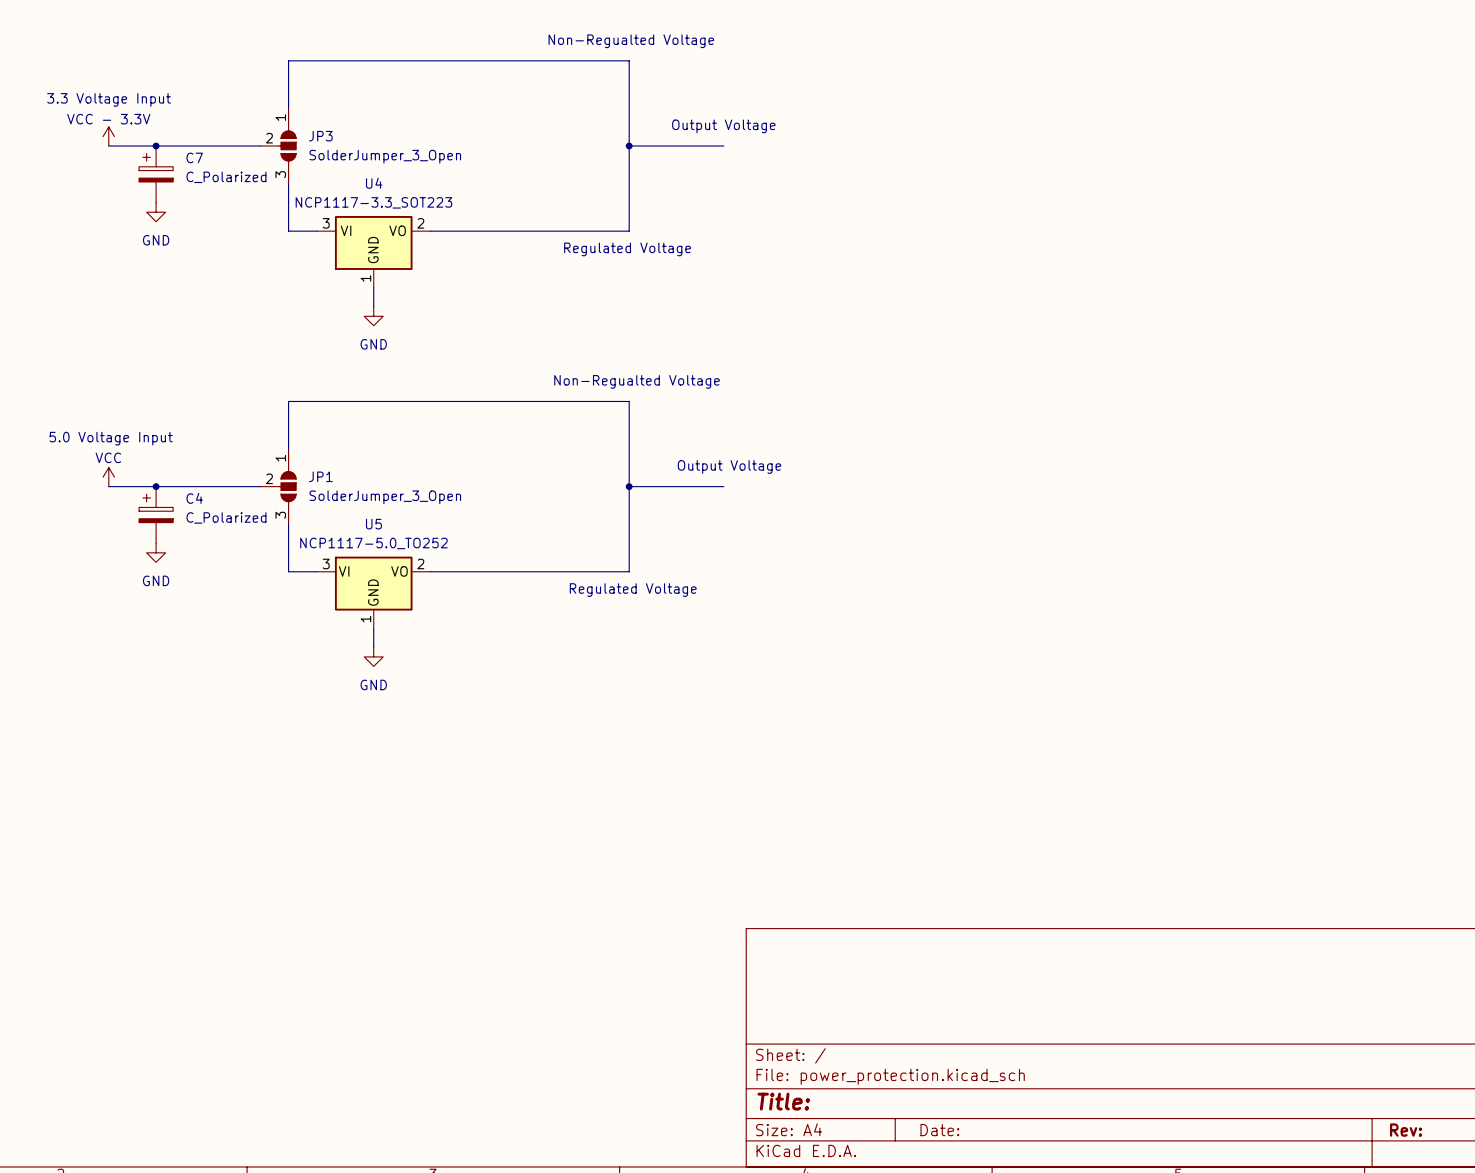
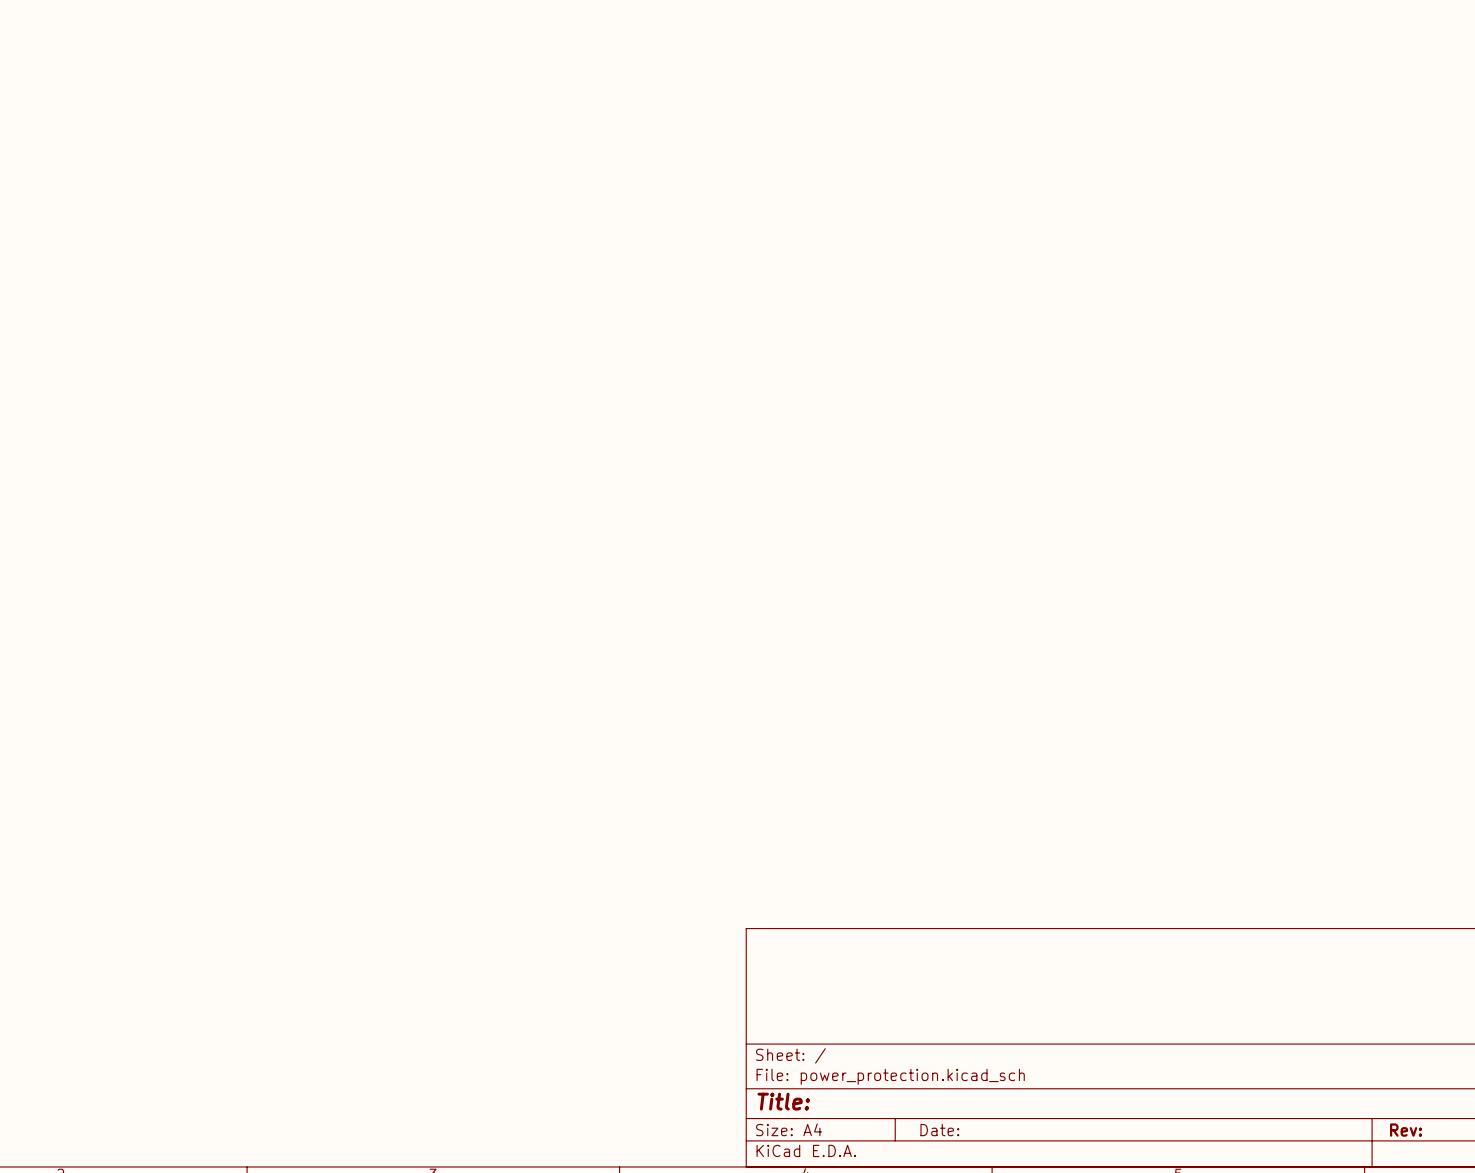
text: Non-Regualted Voltage (631, 41) -> none
text: 3.3 Voltage Input (109, 99) -> none
wire: (288, 108) (288, 60) (629, 60) (629, 231) (430, 231) -> none
text: Output Voltage (723, 126) -> none
power symbol: VCC - 3.3V (108, 136) -> none
wire: (108, 145) (260, 145) -> none
junction: (156, 145) -> none
JP3: SolderJumper_3_Open (278, 145) -> none
wire: (629, 145) (723, 145) -> none
junction: (629, 145) -> none
C7: C_Polarized (156, 174) -> none
wire: (288, 183) (288, 231) (316, 231) -> none
power symbol: GND (156, 212) -> none
text: Regulated Voltage (627, 249) -> none
U4: NCP1117-3.3_SOT223 (373, 251) -> none
wire: (373, 287) (373, 306) -> none
power symbol: GND (373, 316) -> none
text: Non-Regualted Voltage (636, 381) -> none
text: 5.0 Voltage Input (111, 438) -> none
wire: (288, 448) (288, 401) (629, 401) (629, 571) (430, 571) -> none
text: Output Voltage (729, 467) -> none
power symbol: VCC (108, 477) -> none
wire: (108, 486) (260, 486) -> none
junction: (156, 486) -> none
JP1: SolderJumper_3_Open (278, 486) -> none
wire: (629, 486) (723, 486) -> none
junction: (629, 486) -> none
C4: C_Polarized (156, 515) -> none
wire: (288, 524) (288, 571) (316, 571) -> none
power symbol: GND (156, 552) -> none
text: Regulated Voltage (633, 590) -> none
U5: NCP1117-5.0_TO252 (373, 592) -> none
wire: (373, 628) (373, 647) -> none
power symbol: GND (373, 656) -> none

